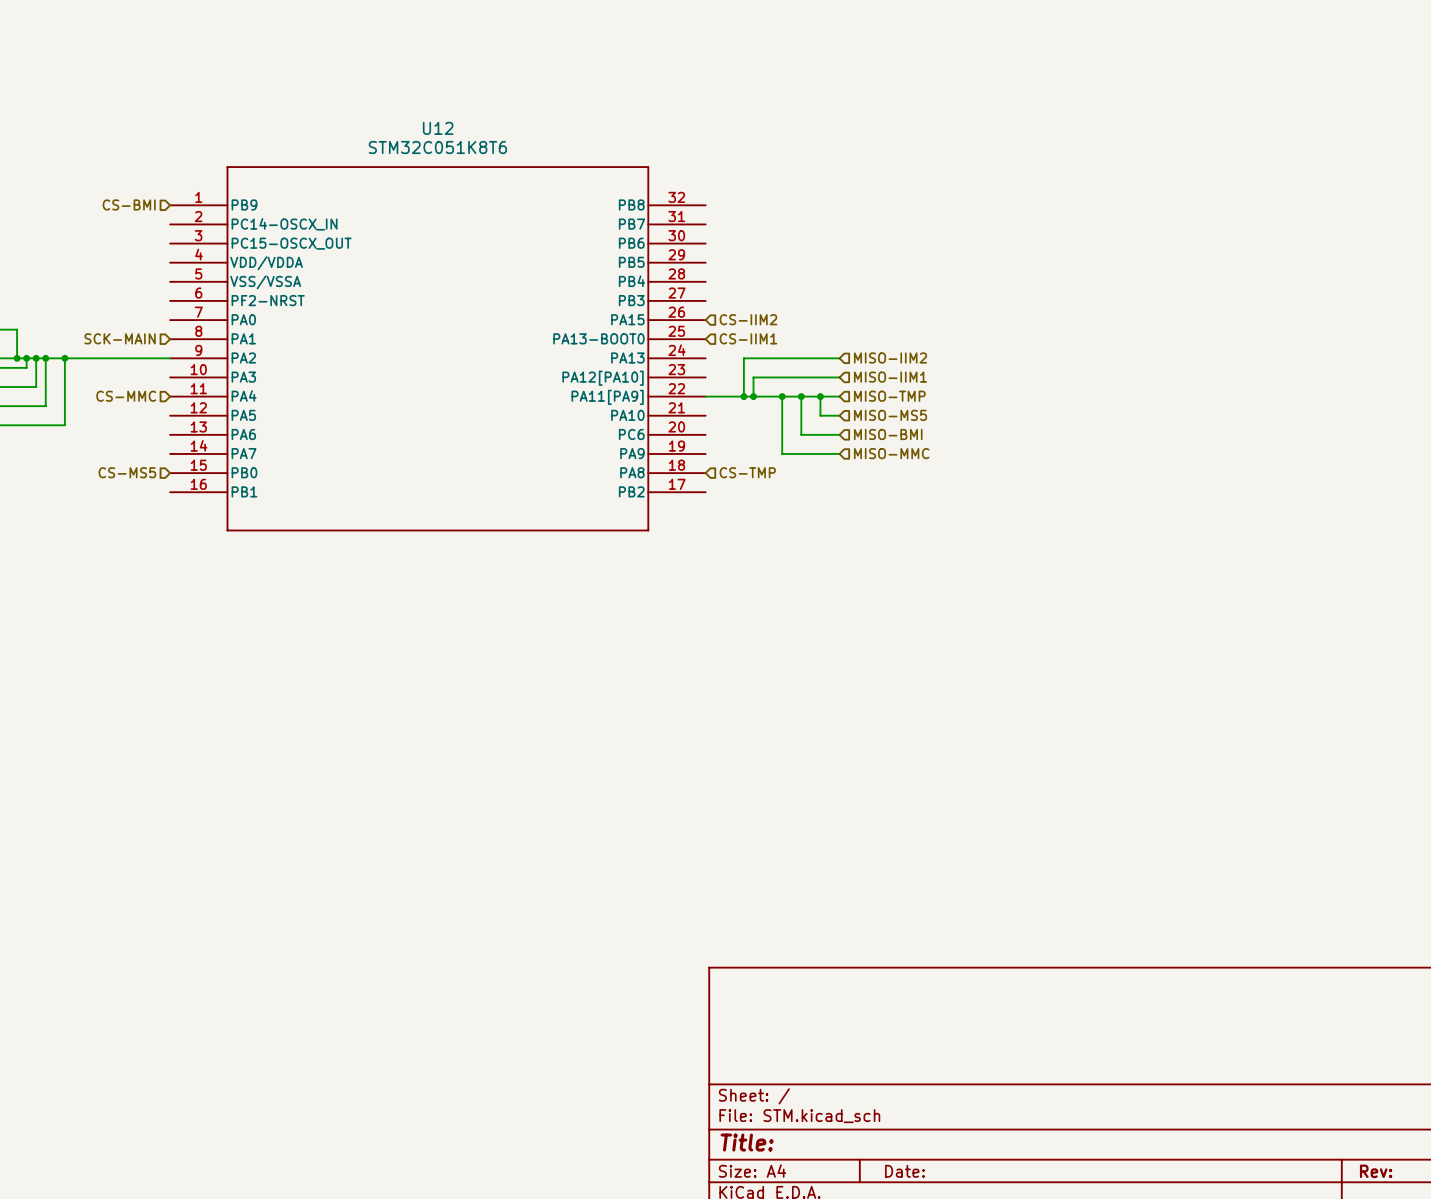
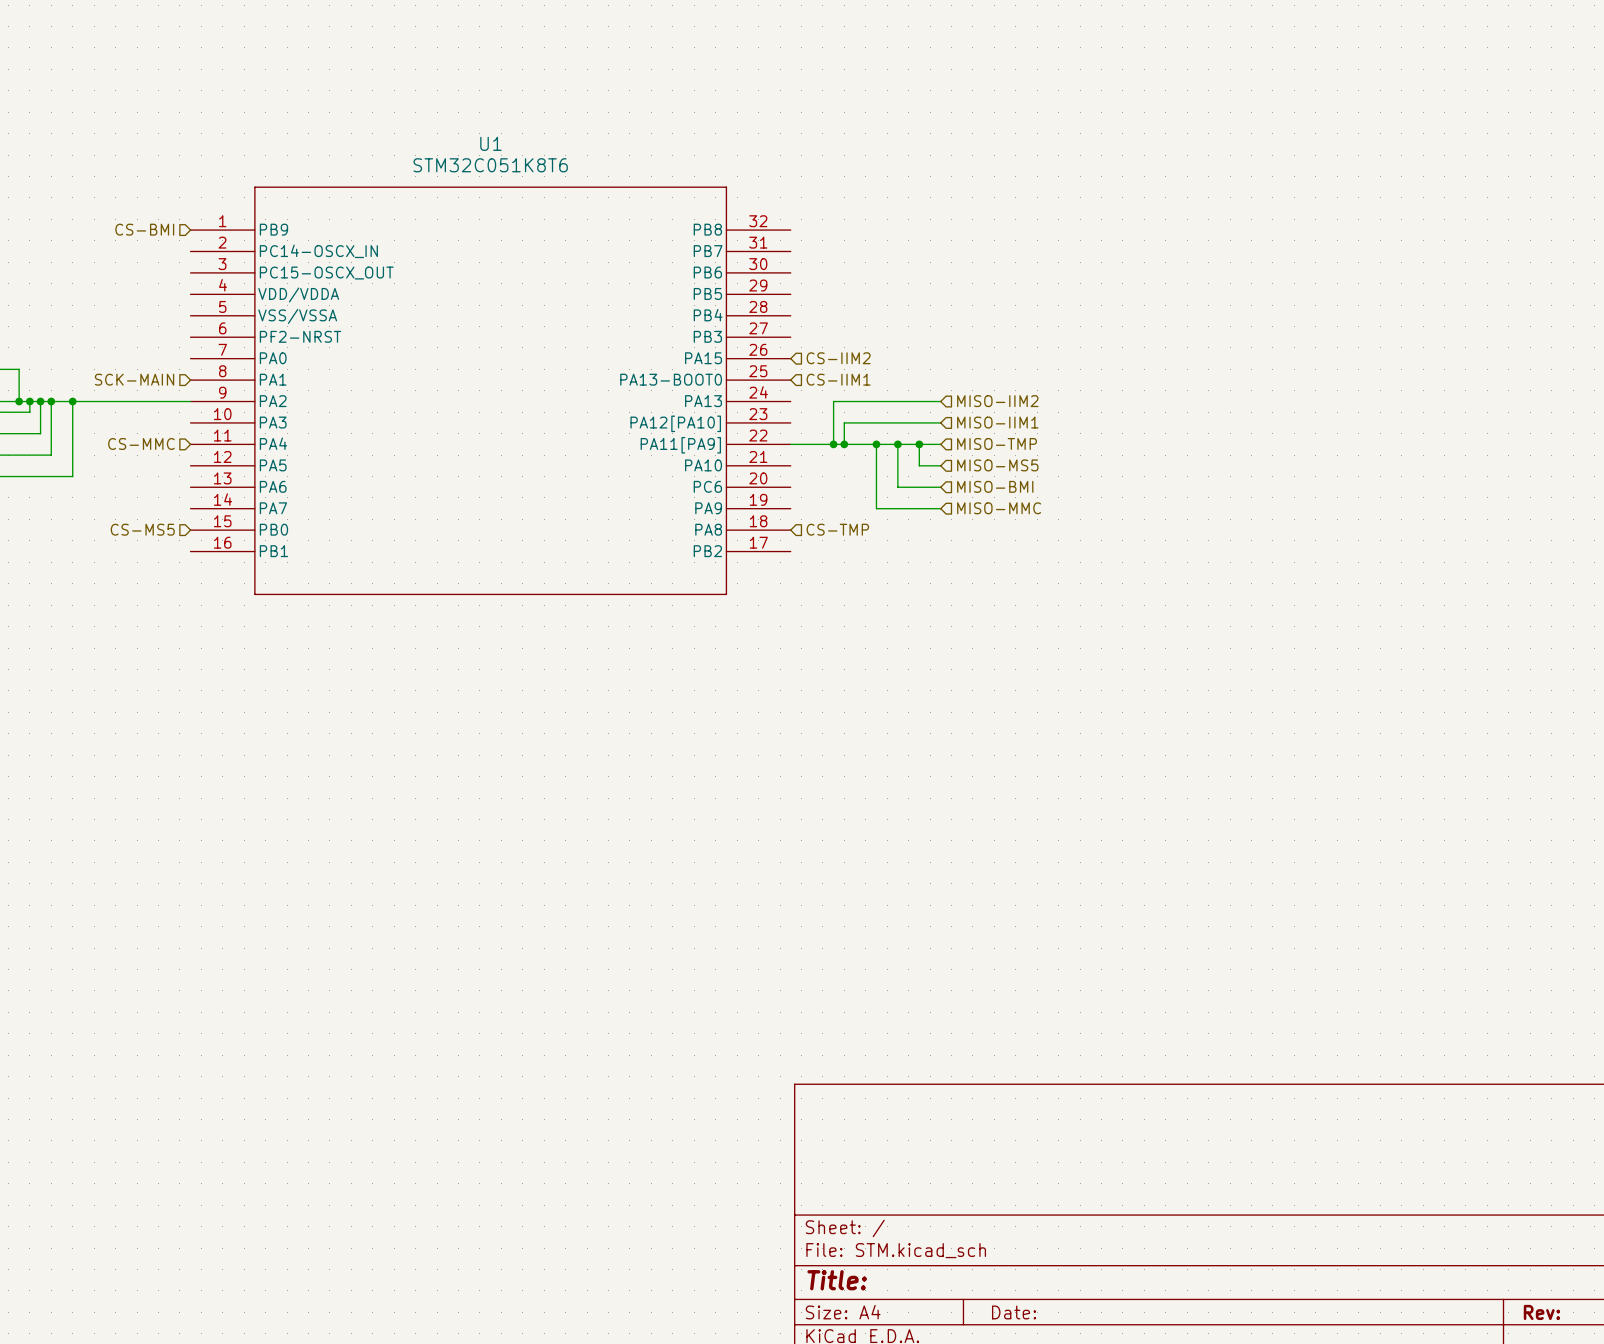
U12 name: U12 (438, 128) -> U1 (490, 143)

